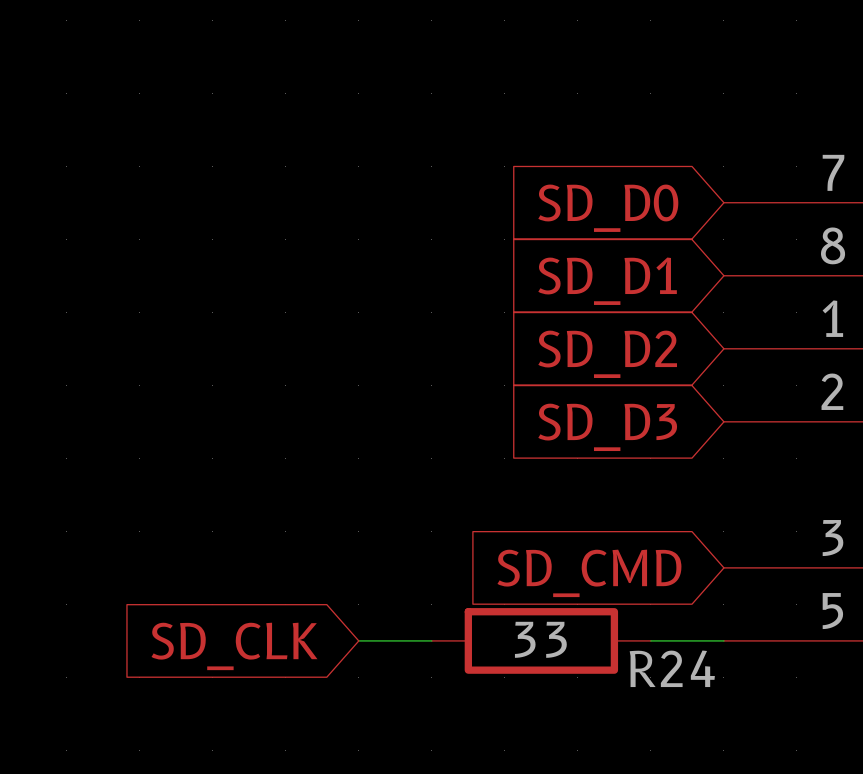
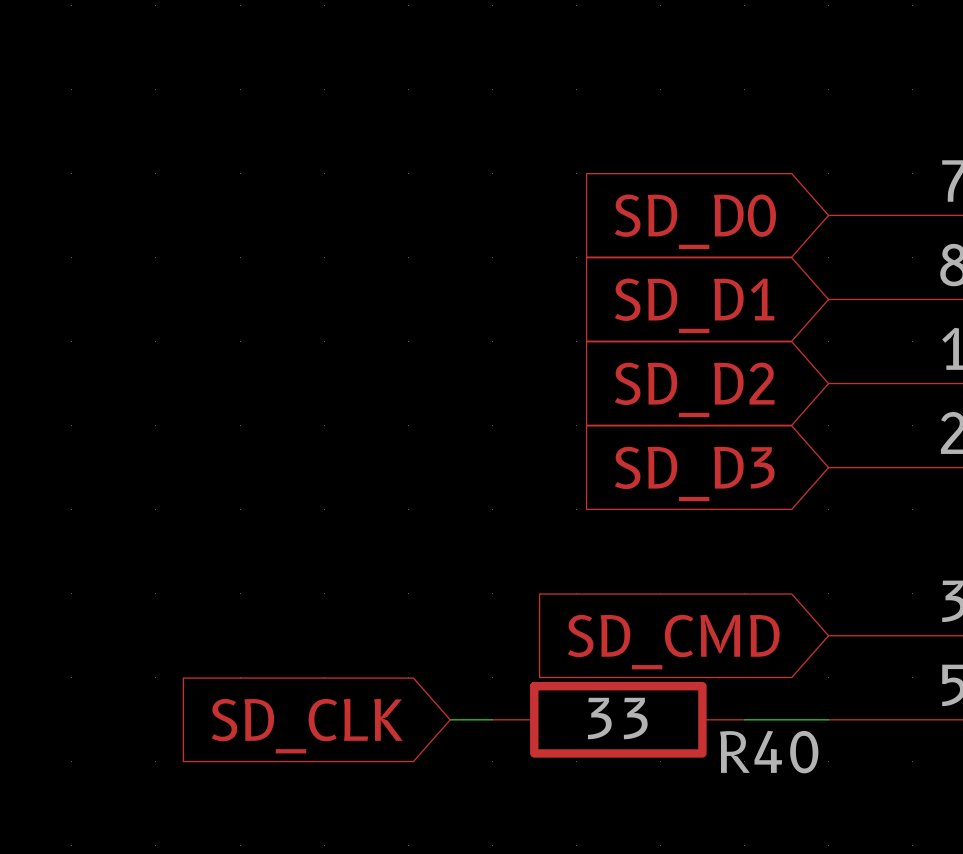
wire: (358, 640) (395, 640) -> none
global label position: SD_CLK (234, 646) -> SD_CLK (307, 726)
R24 name: R24 (672, 668) -> R40 (769, 752)

